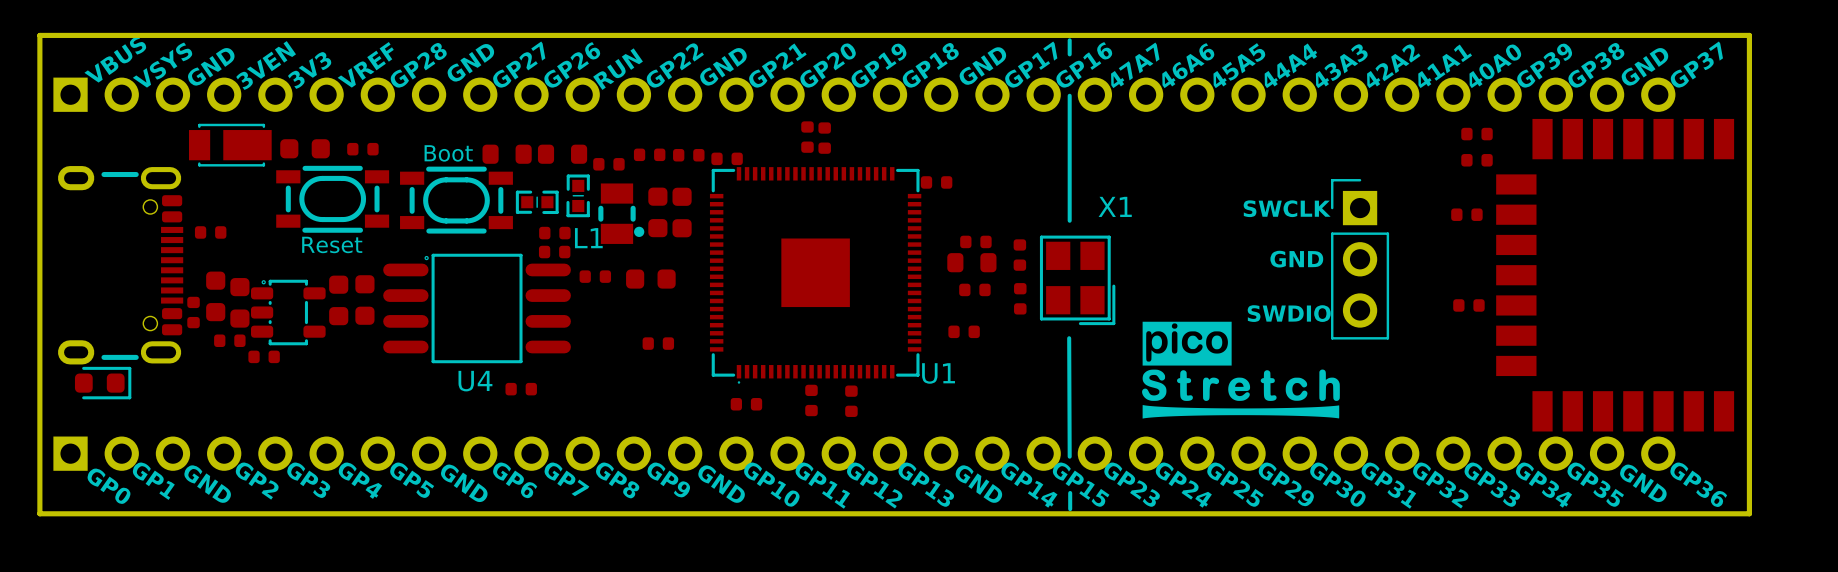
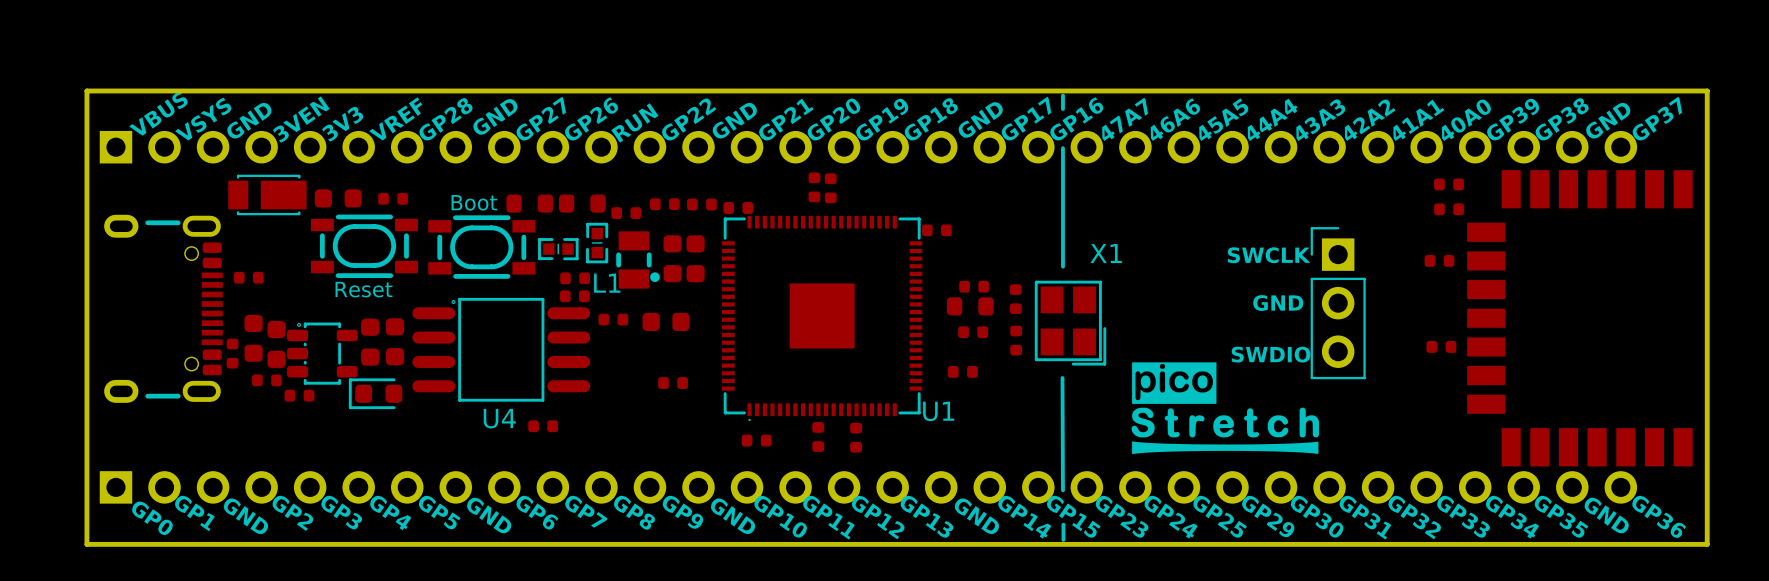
part rotation: 0° (103, 383) -> 180° (375, 393)
part position: (103, 383) -> (375, 393)

